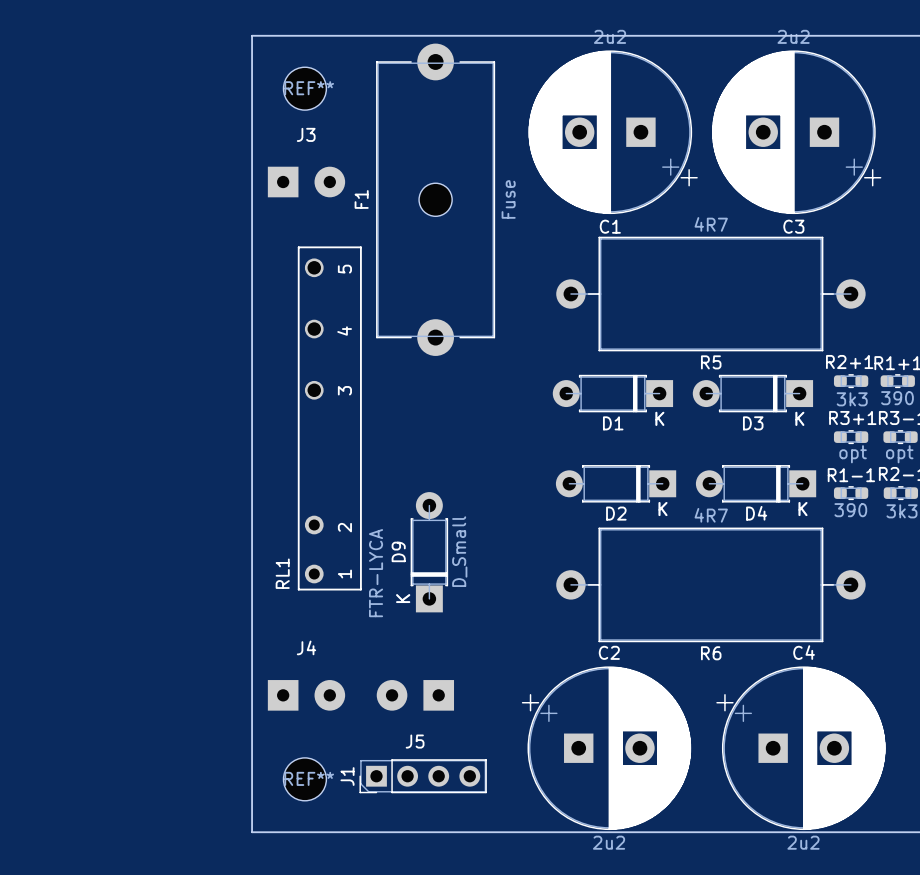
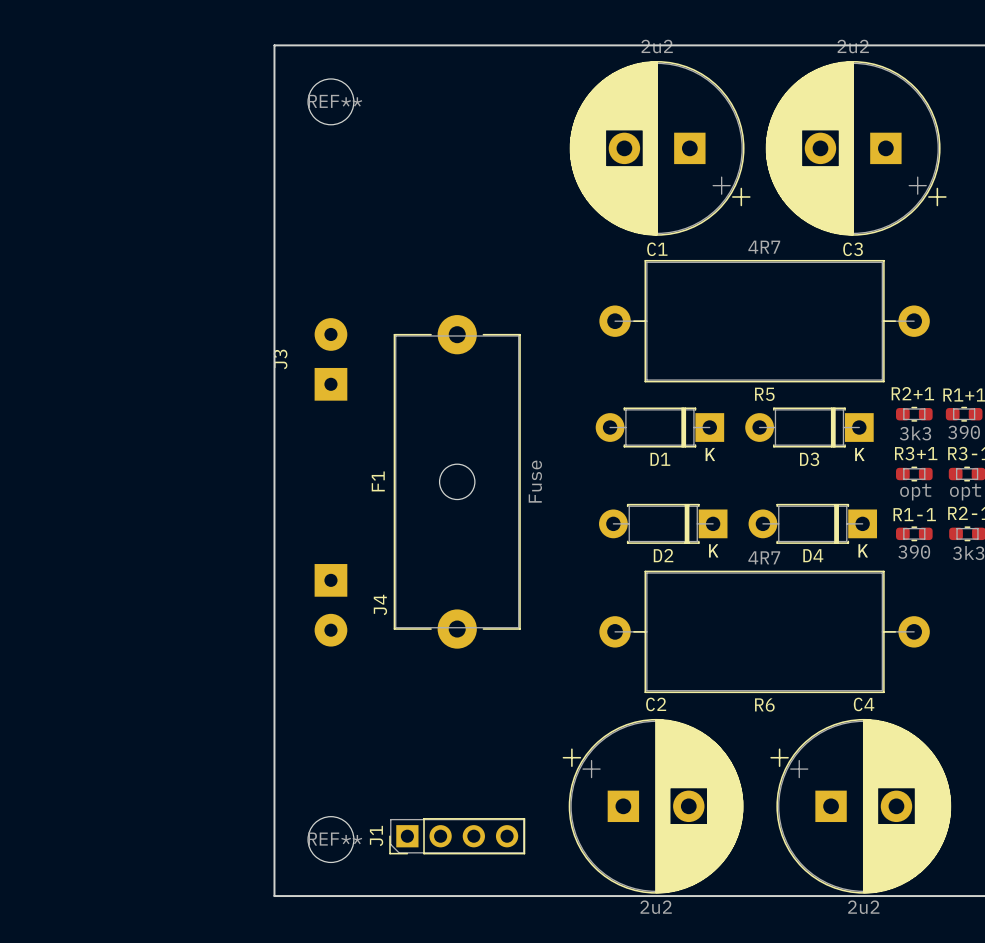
J3 rotation: 0° (306, 182) -> 90° counterclockwise (330, 359)
J3 position: (306, 182) -> (330, 359)
F1 position: (435, 199) -> (457, 481)
RL1: FTR-LYCA (329, 418) -> none
D9: D_Small (429, 552) -> none
J4 rotation: 0° (306, 695) -> 90° clockwise (330, 605)
J4 position: (306, 695) -> (330, 605)
J5: (415, 695) -> none

